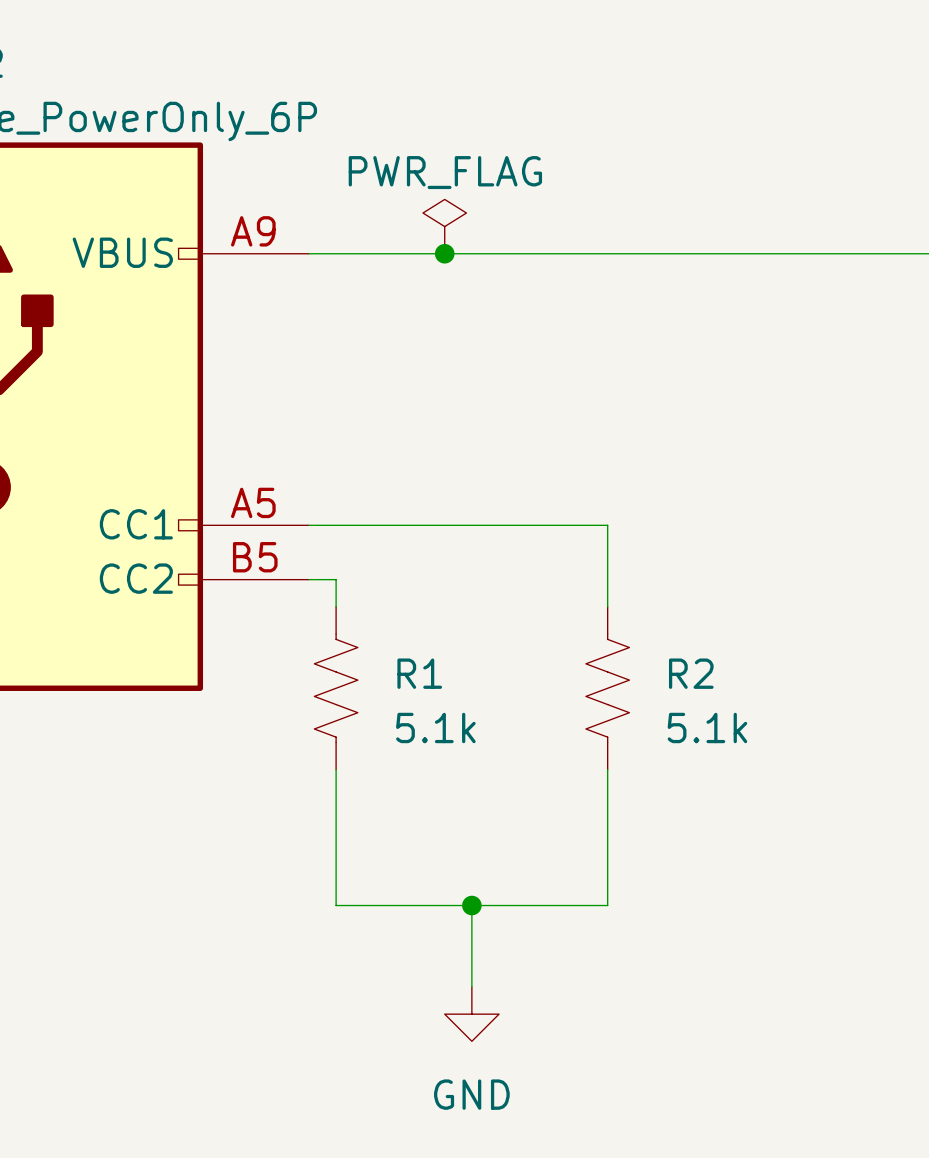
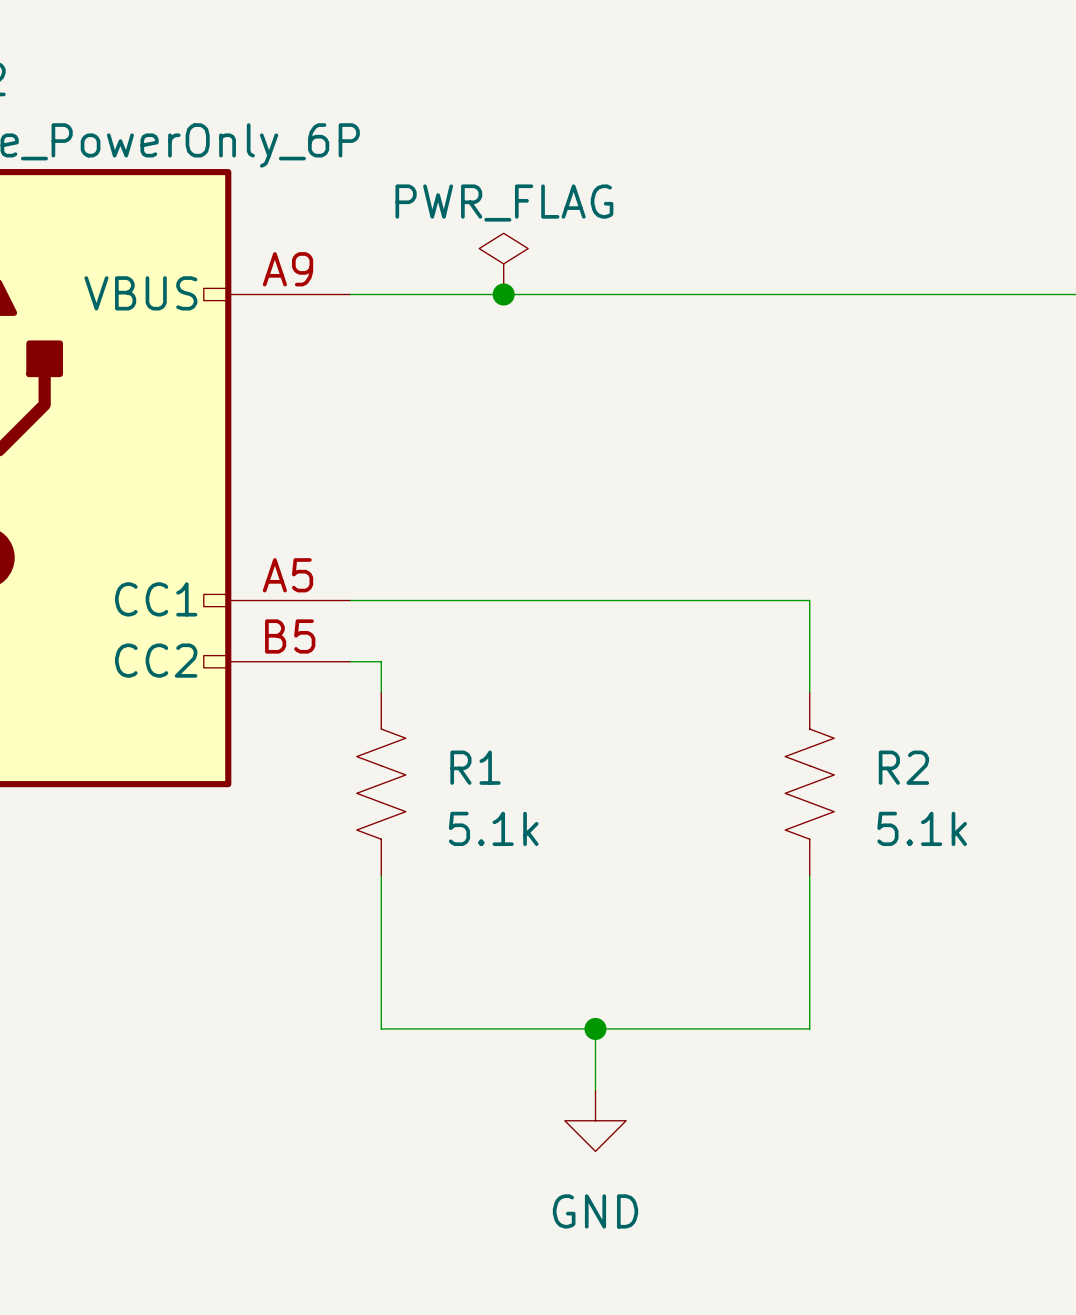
wire: (607, 525) (607, 606) -> (687, 600) (809, 600) (809, 692)
R2 position: (607, 688) -> (809, 784)
wire: (607, 769) (607, 905) -> (809, 875) (809, 1028) (687, 1028)
wire: (471, 905) (471, 986) -> none
junction position: (471, 905) -> (595, 1028)
wire: none -> (595, 1028) (595, 1090)
power symbol position: GND (471, 1014) -> GND (595, 1120)

